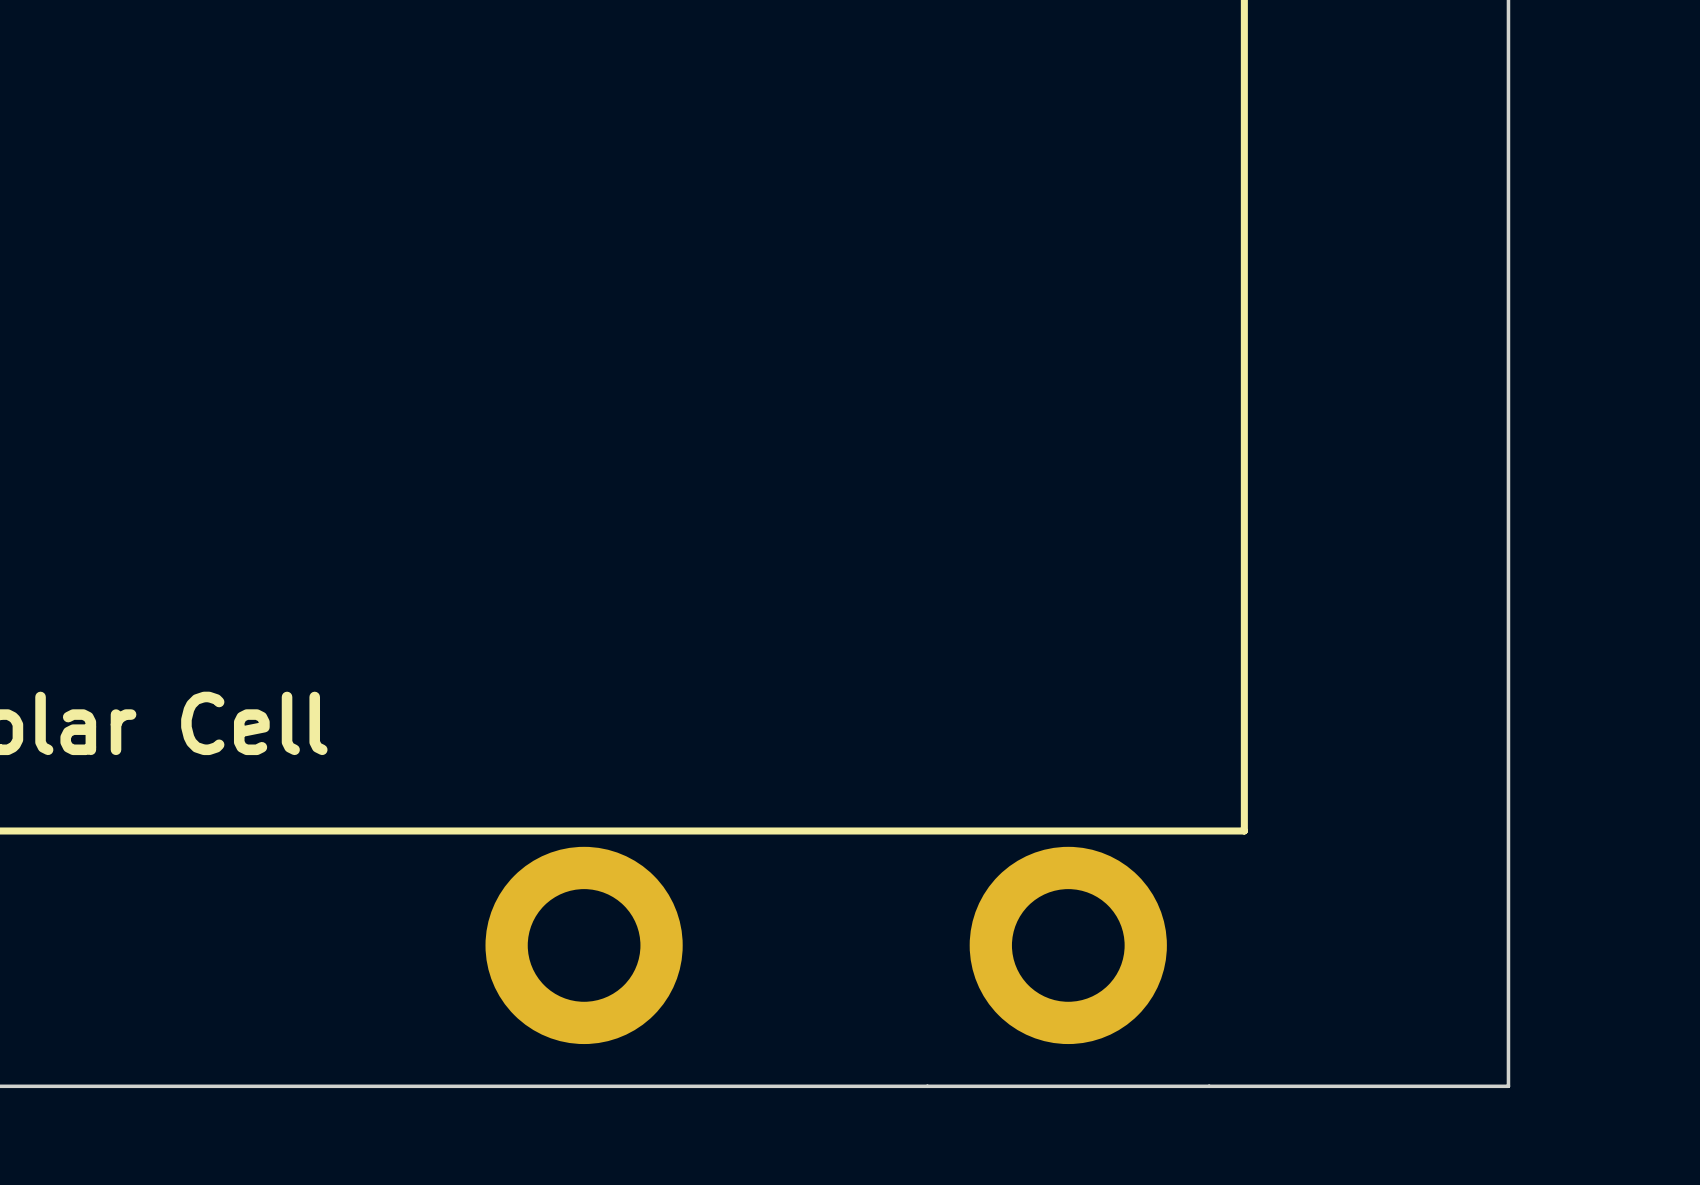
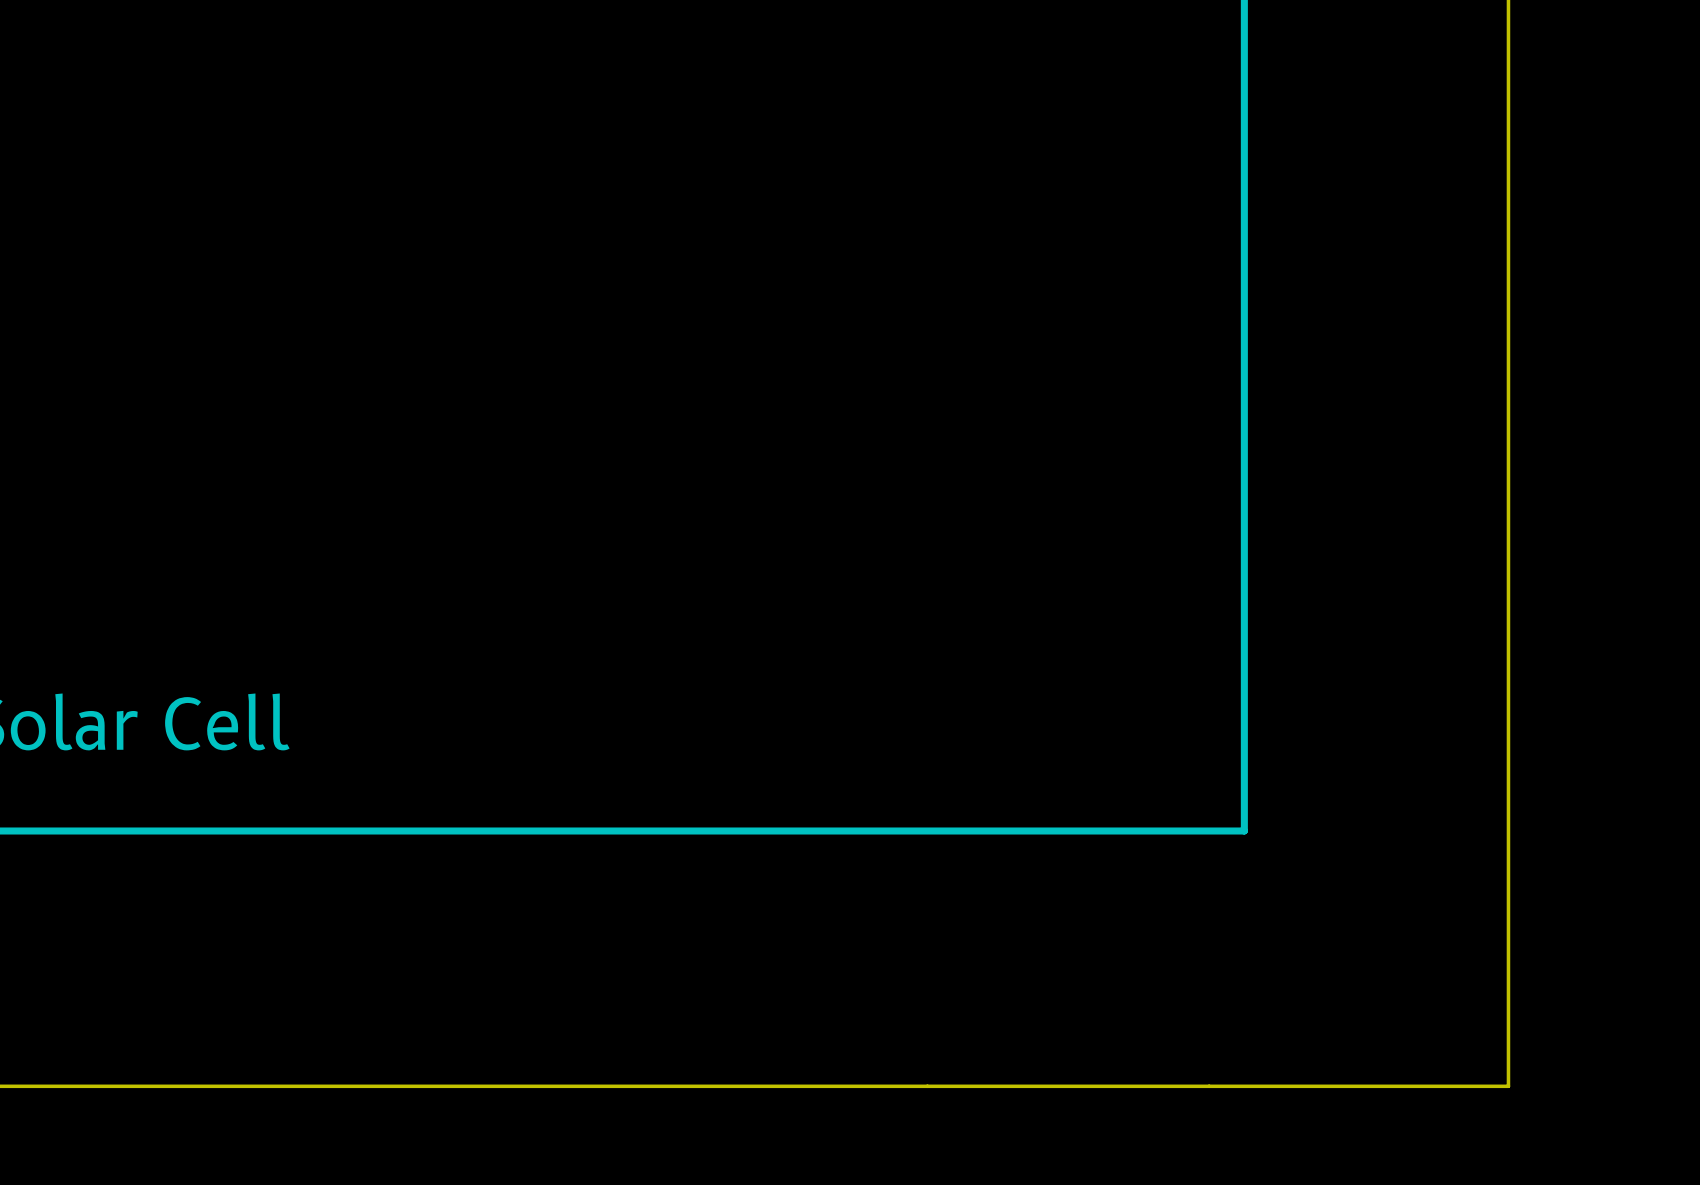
part: (584, 945) -> none
part: (1068, 945) -> none

